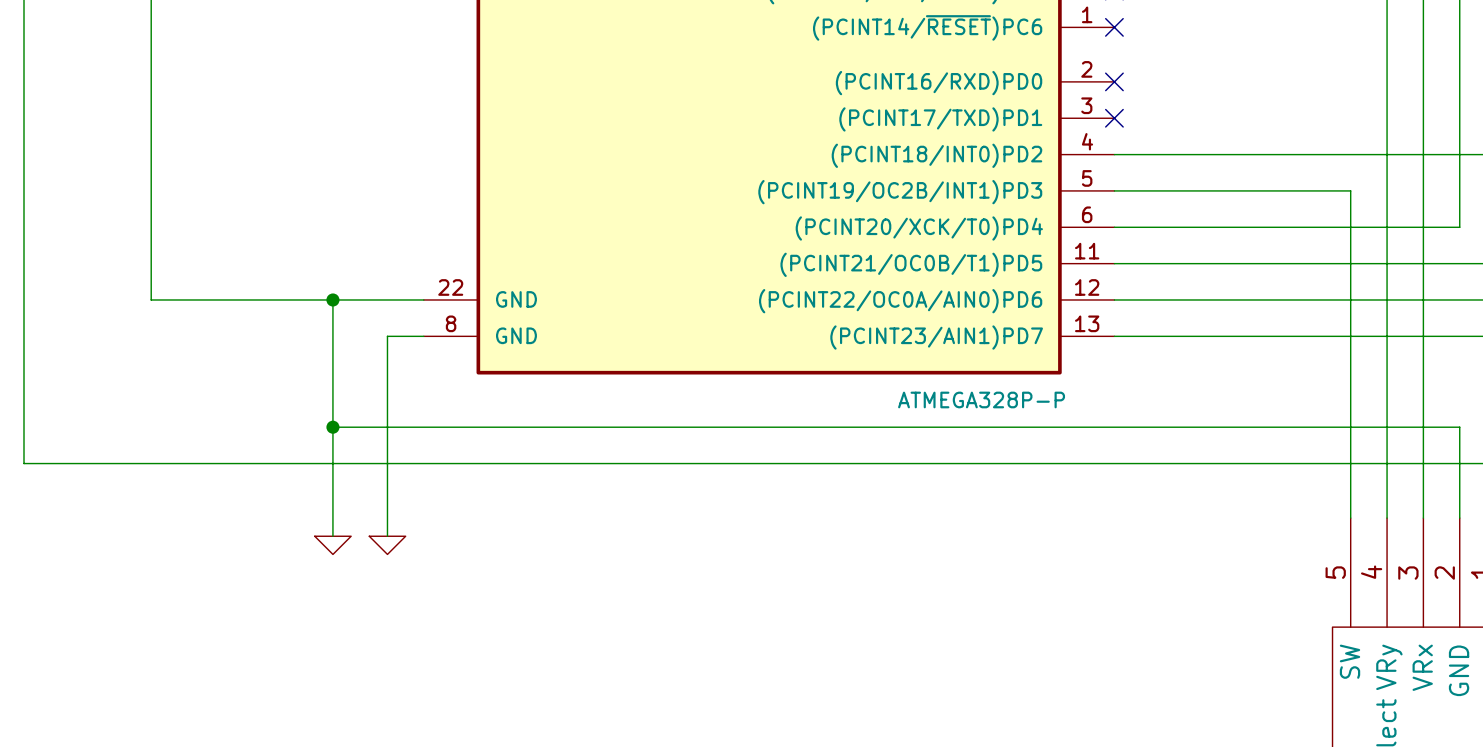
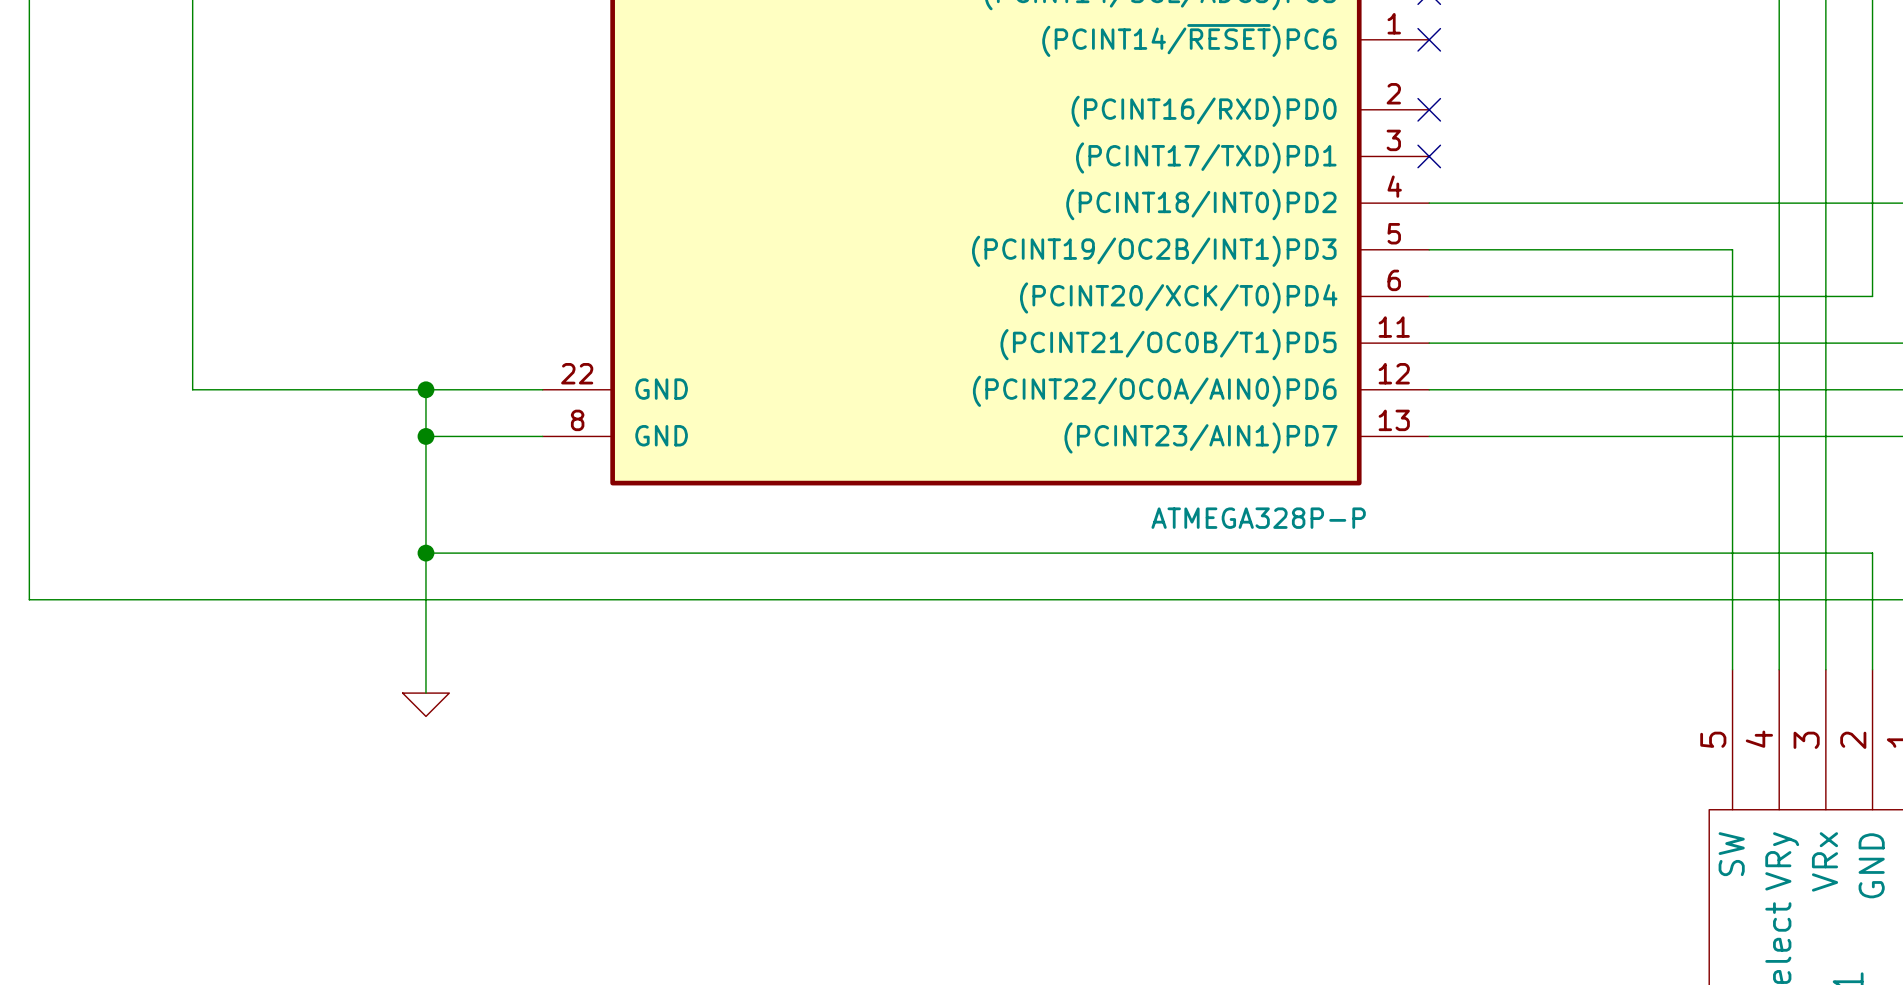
junction: none -> (425, 436)
wire: (387, 336) (387, 536) -> (495, 436) (425, 436)
power symbol: (387, 545) -> none

